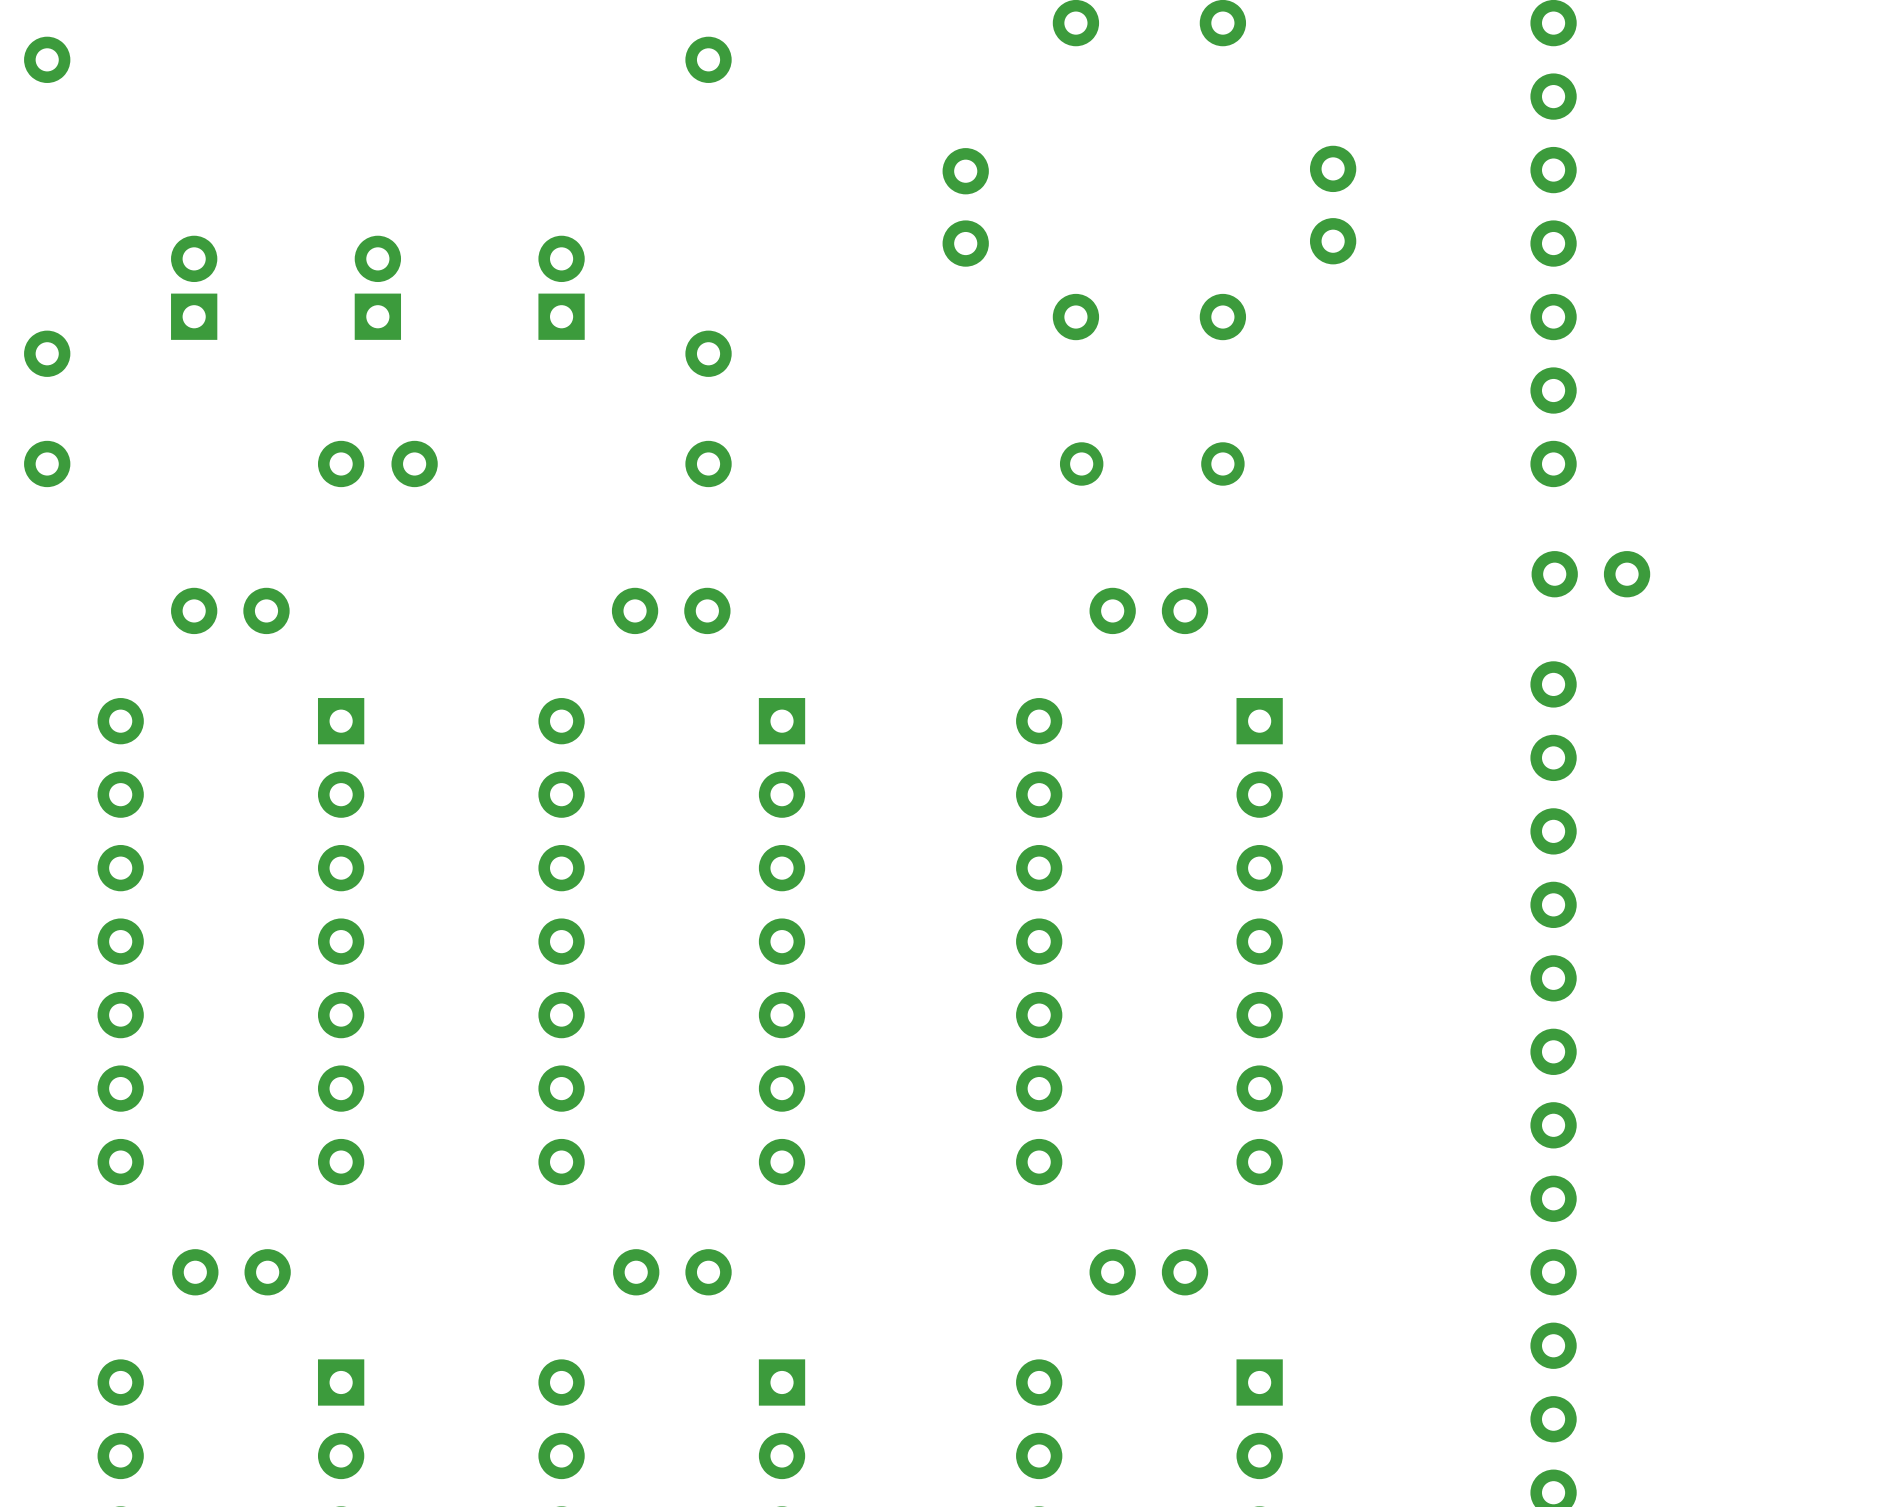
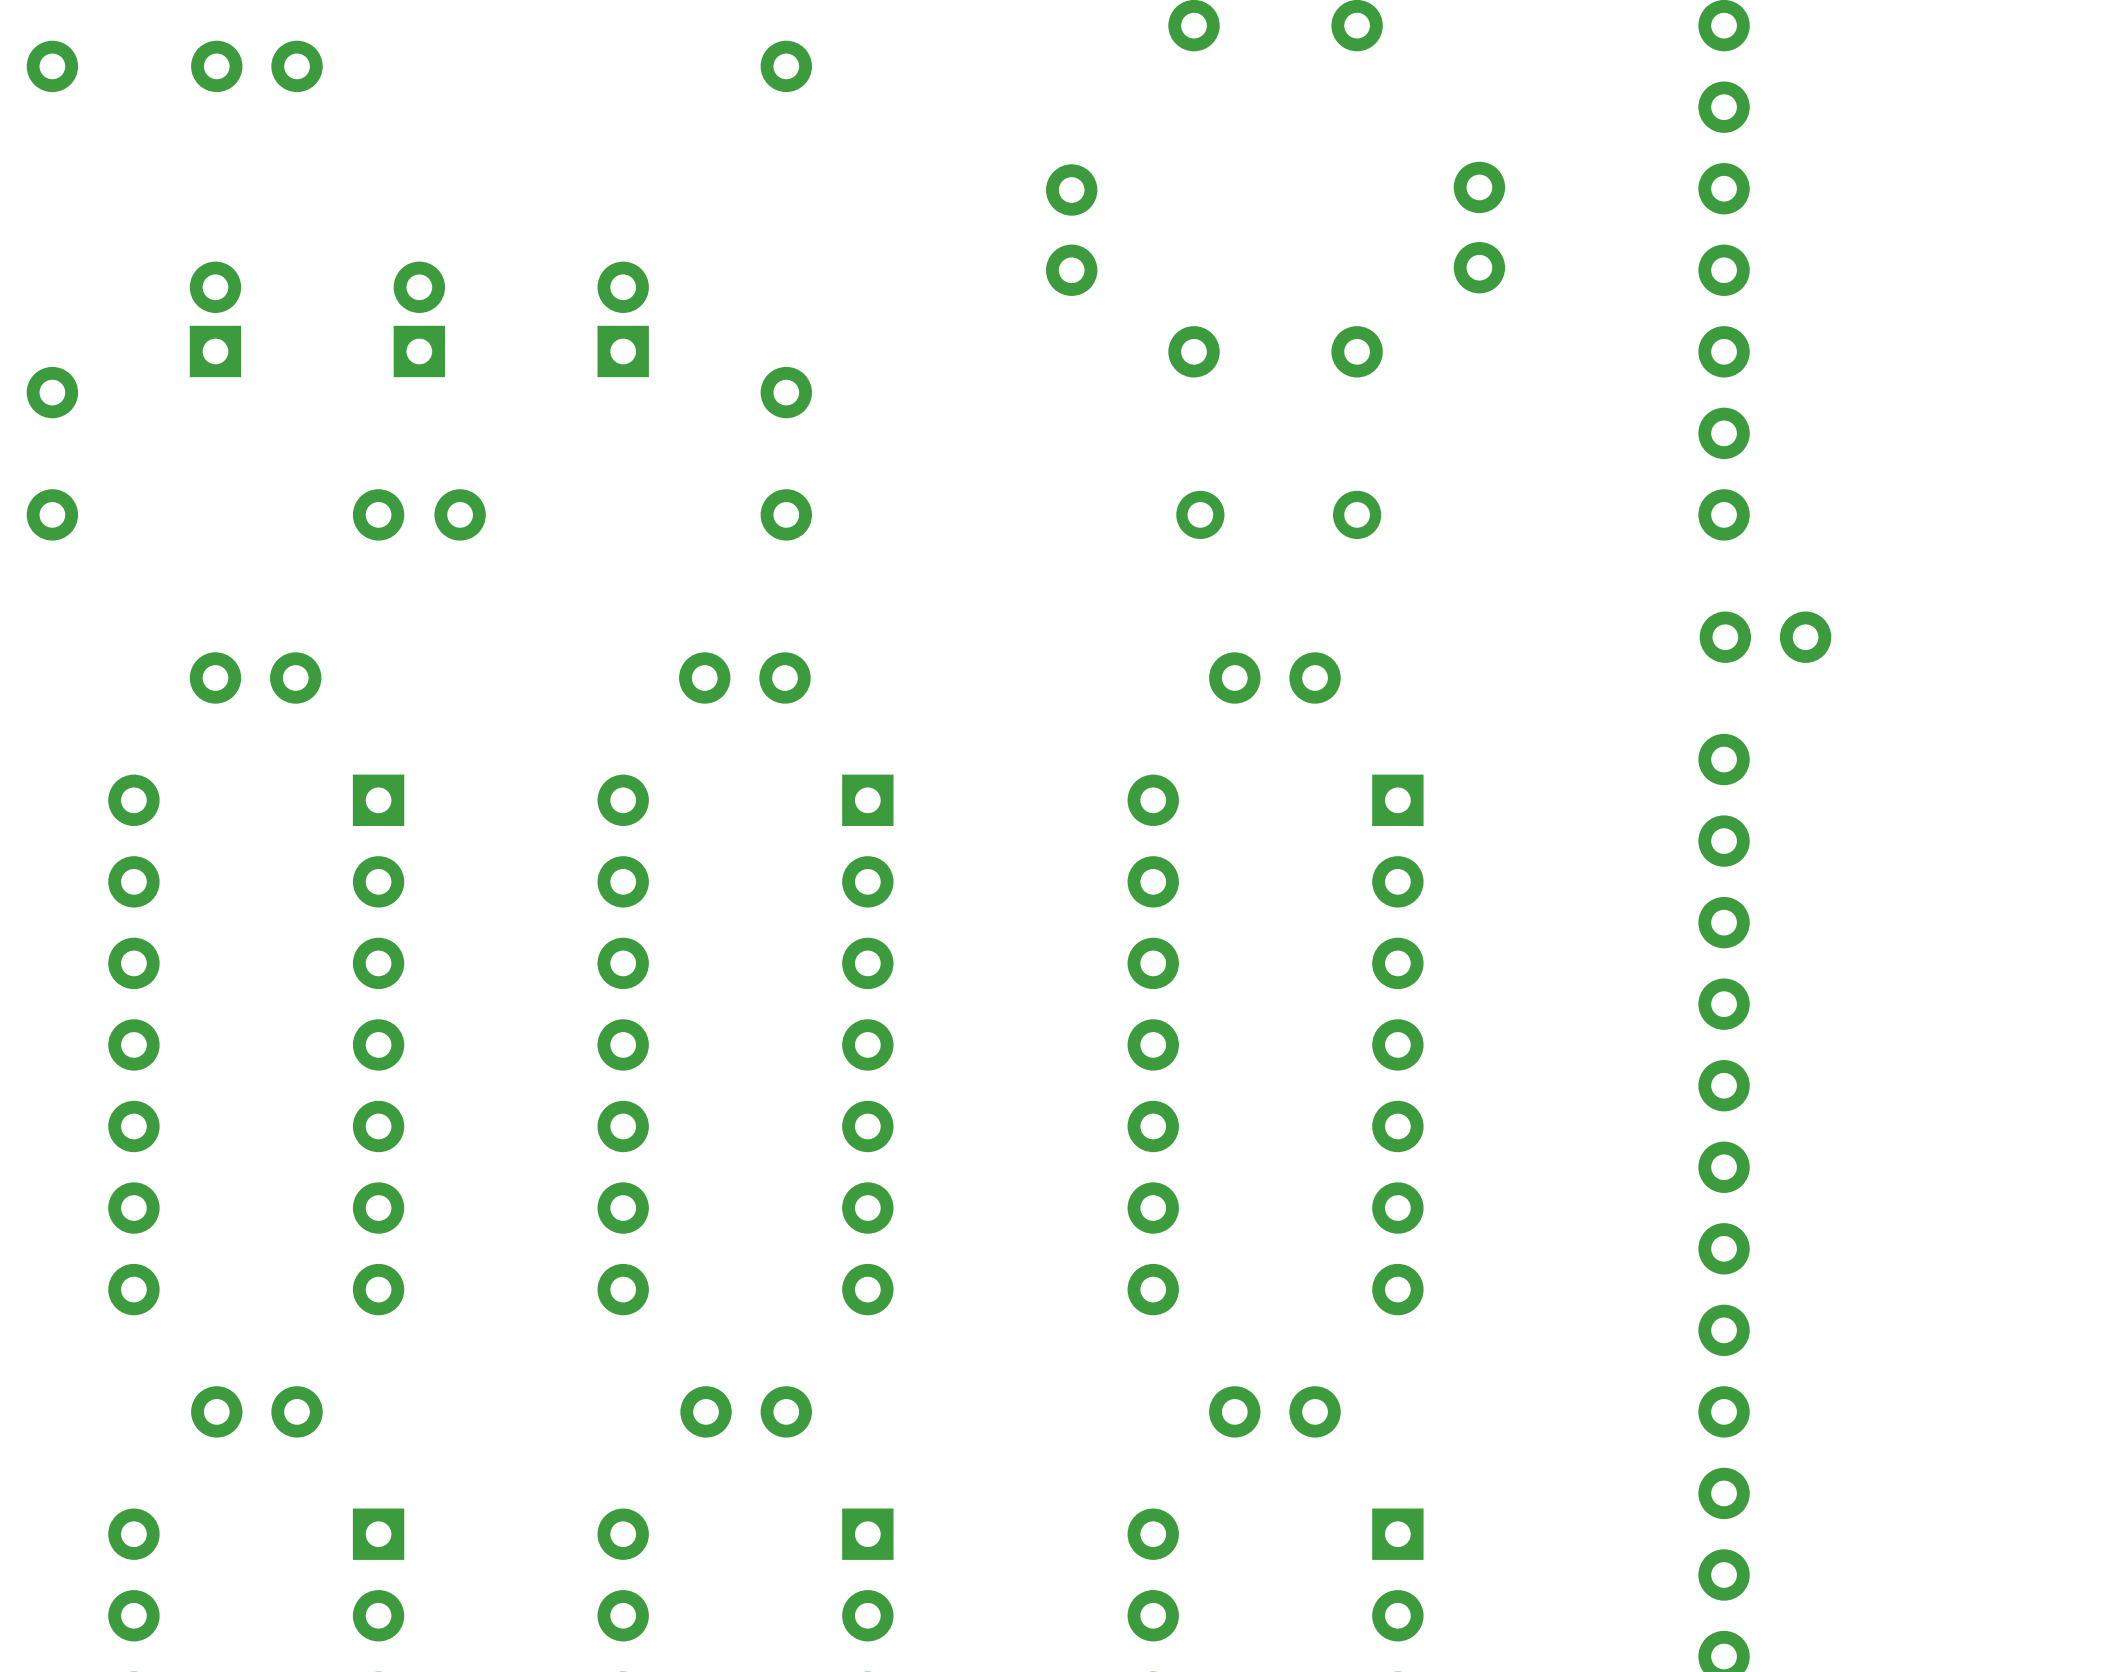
part: none -> (256, 66)

